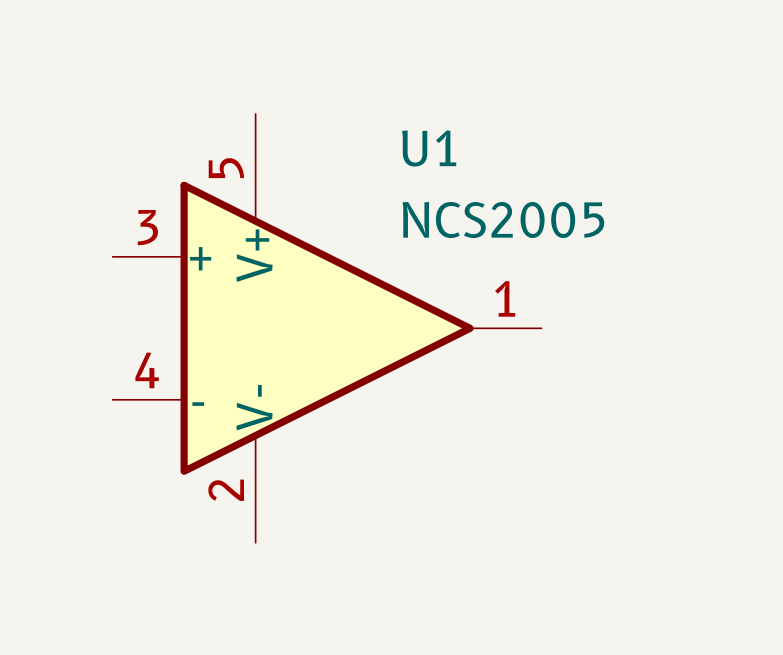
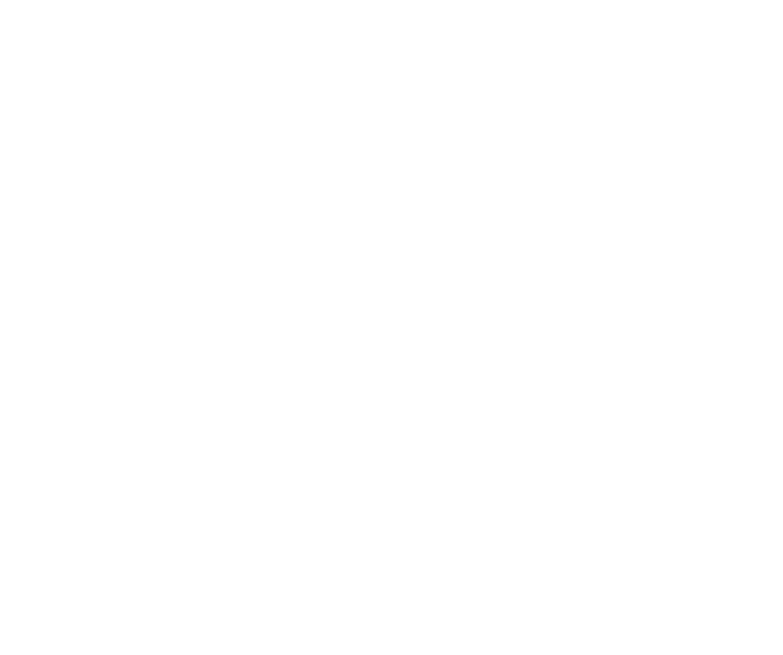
U1: NCS2005 (327, 328) -> none

